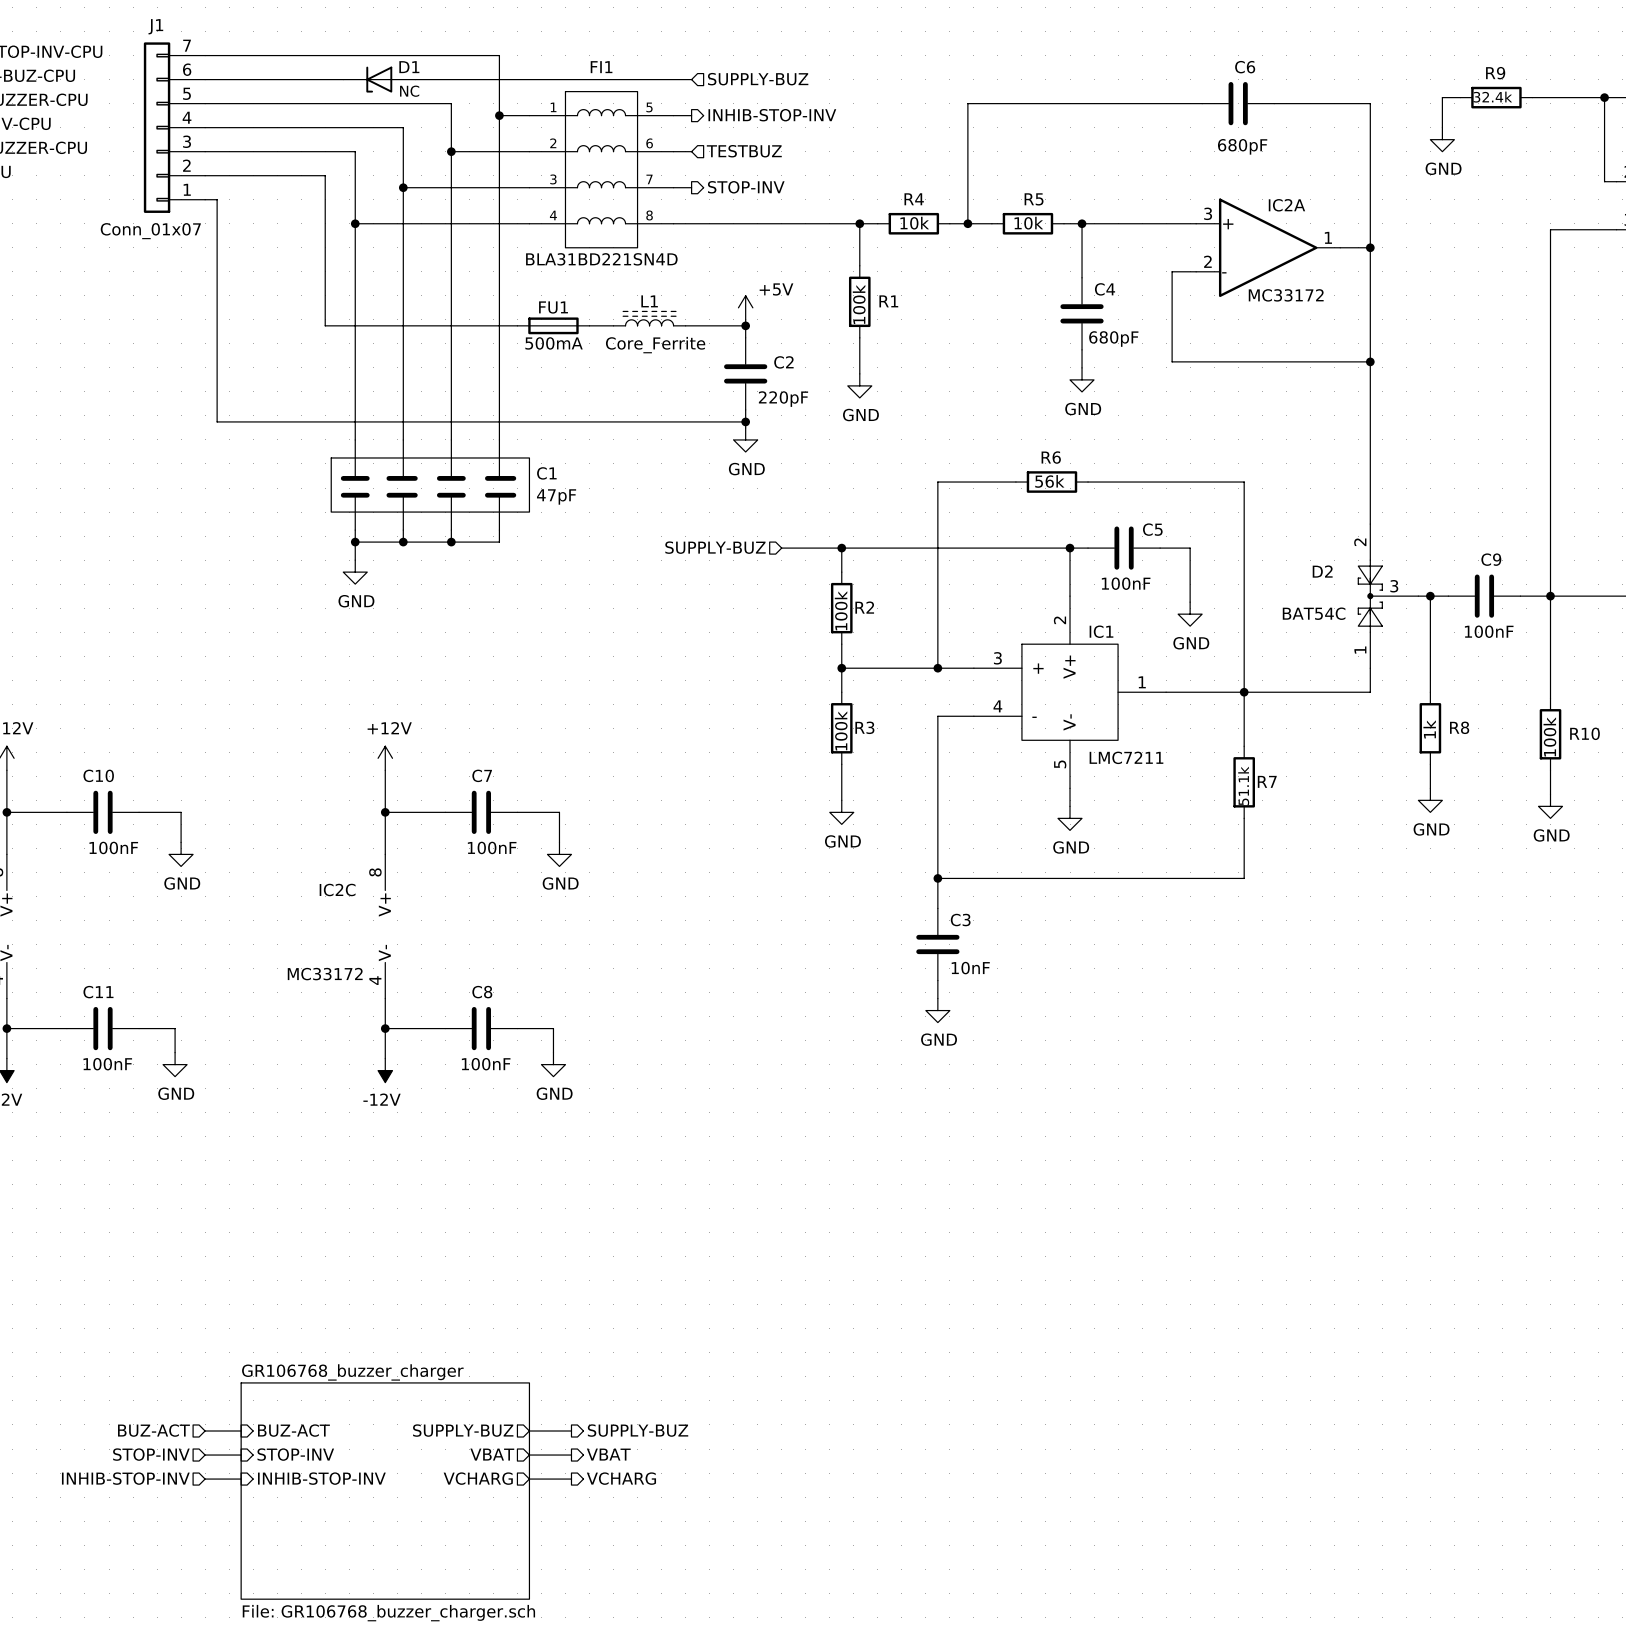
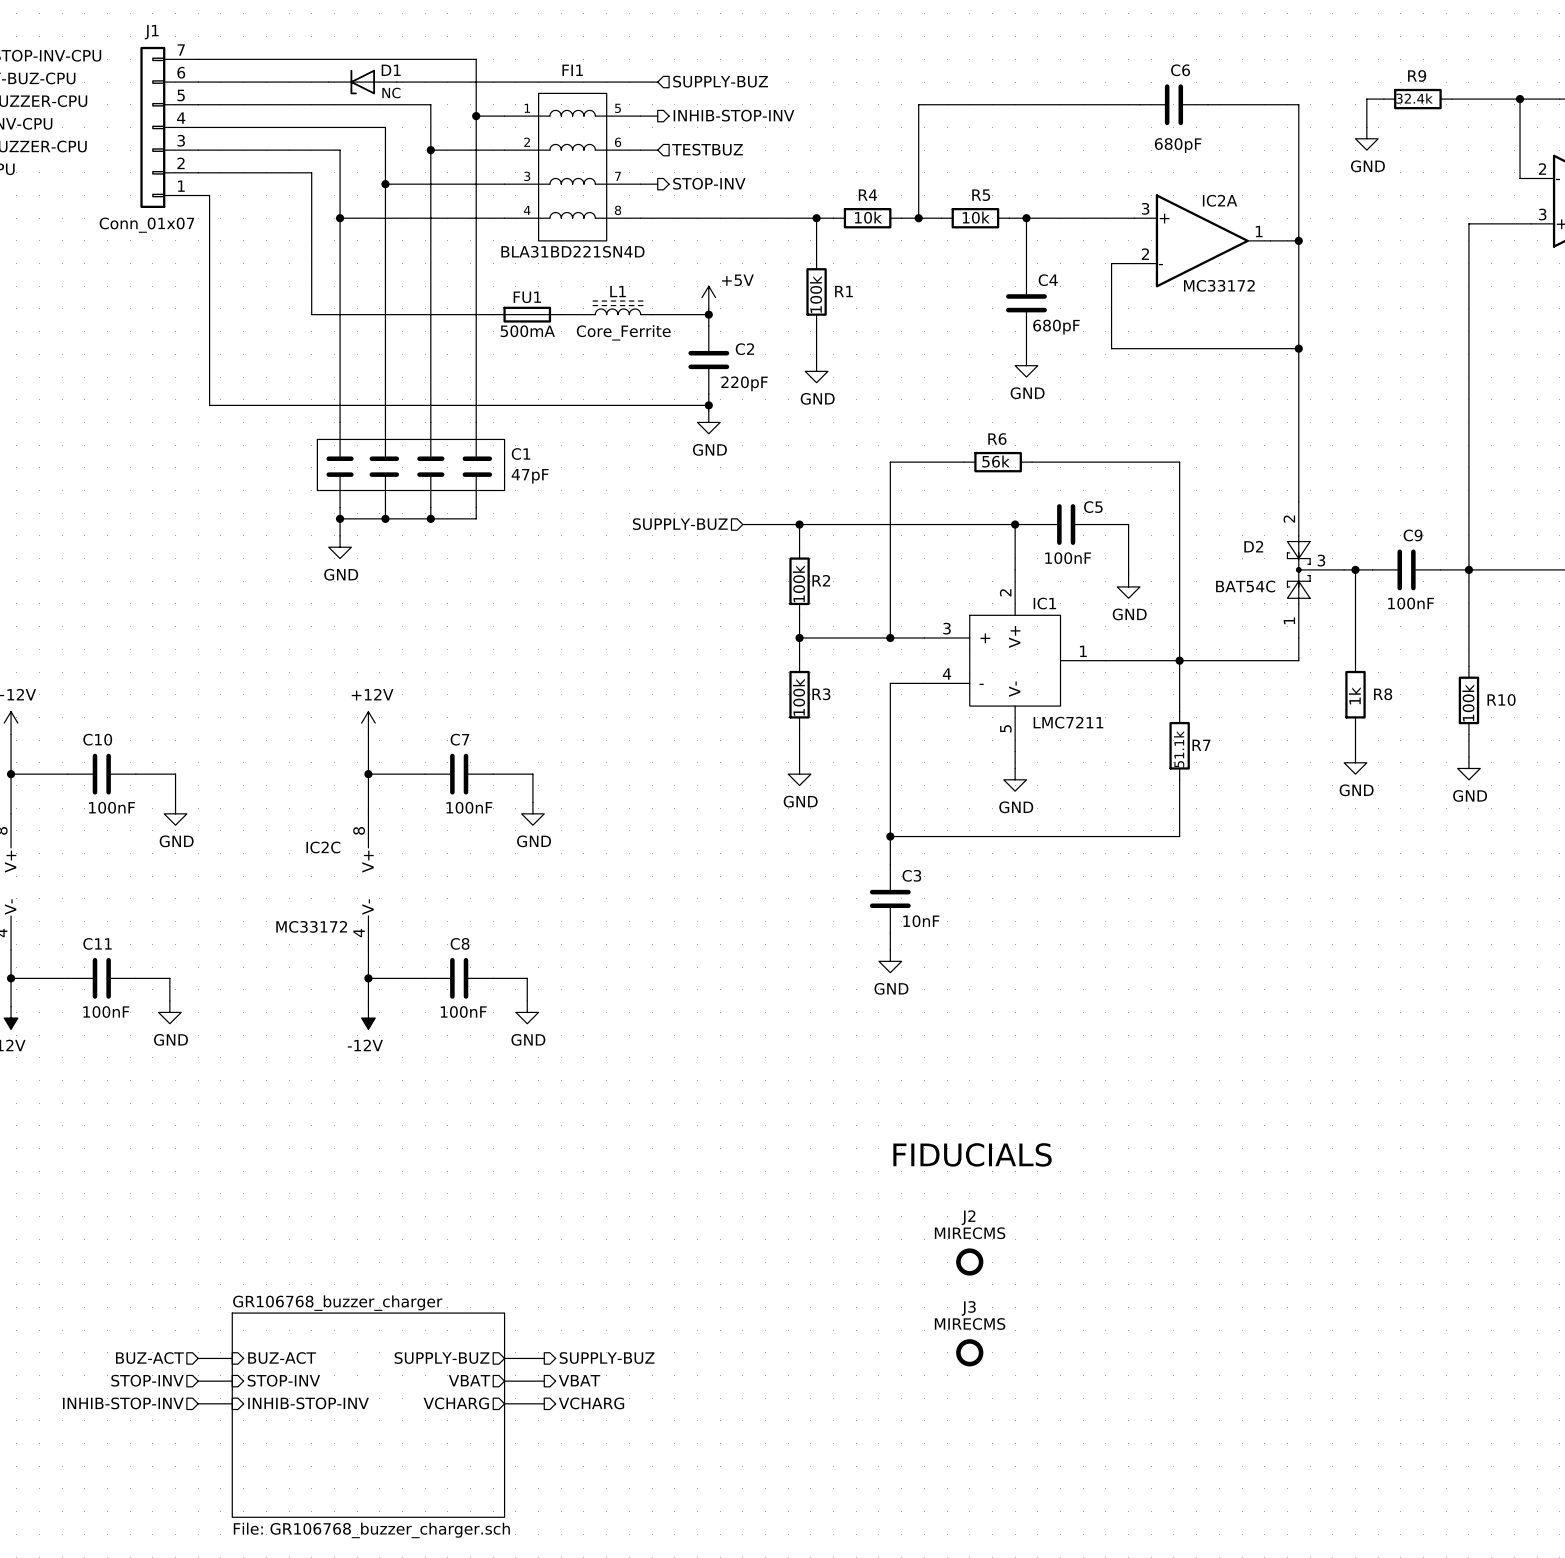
text: none -> FIDUCIALS (972, 1154)
J2: none -> MIRECMS (969, 1262)
J3: none -> MIRECMS (969, 1352)

